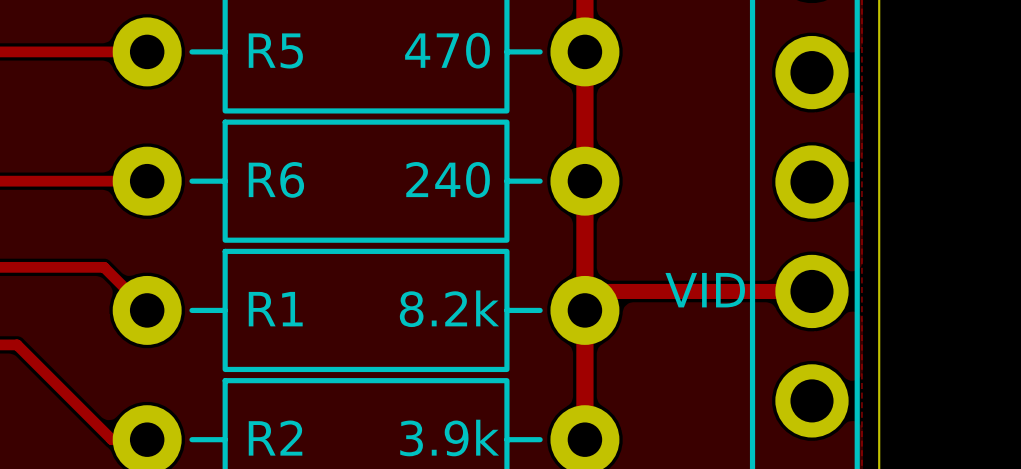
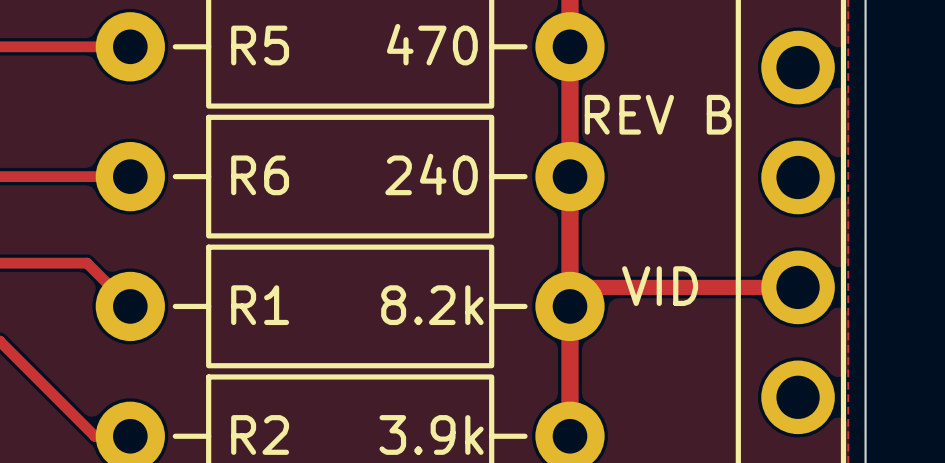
text: none -> REV B (658, 114)
text position: VID (705, 290) -> VID (660, 286)

